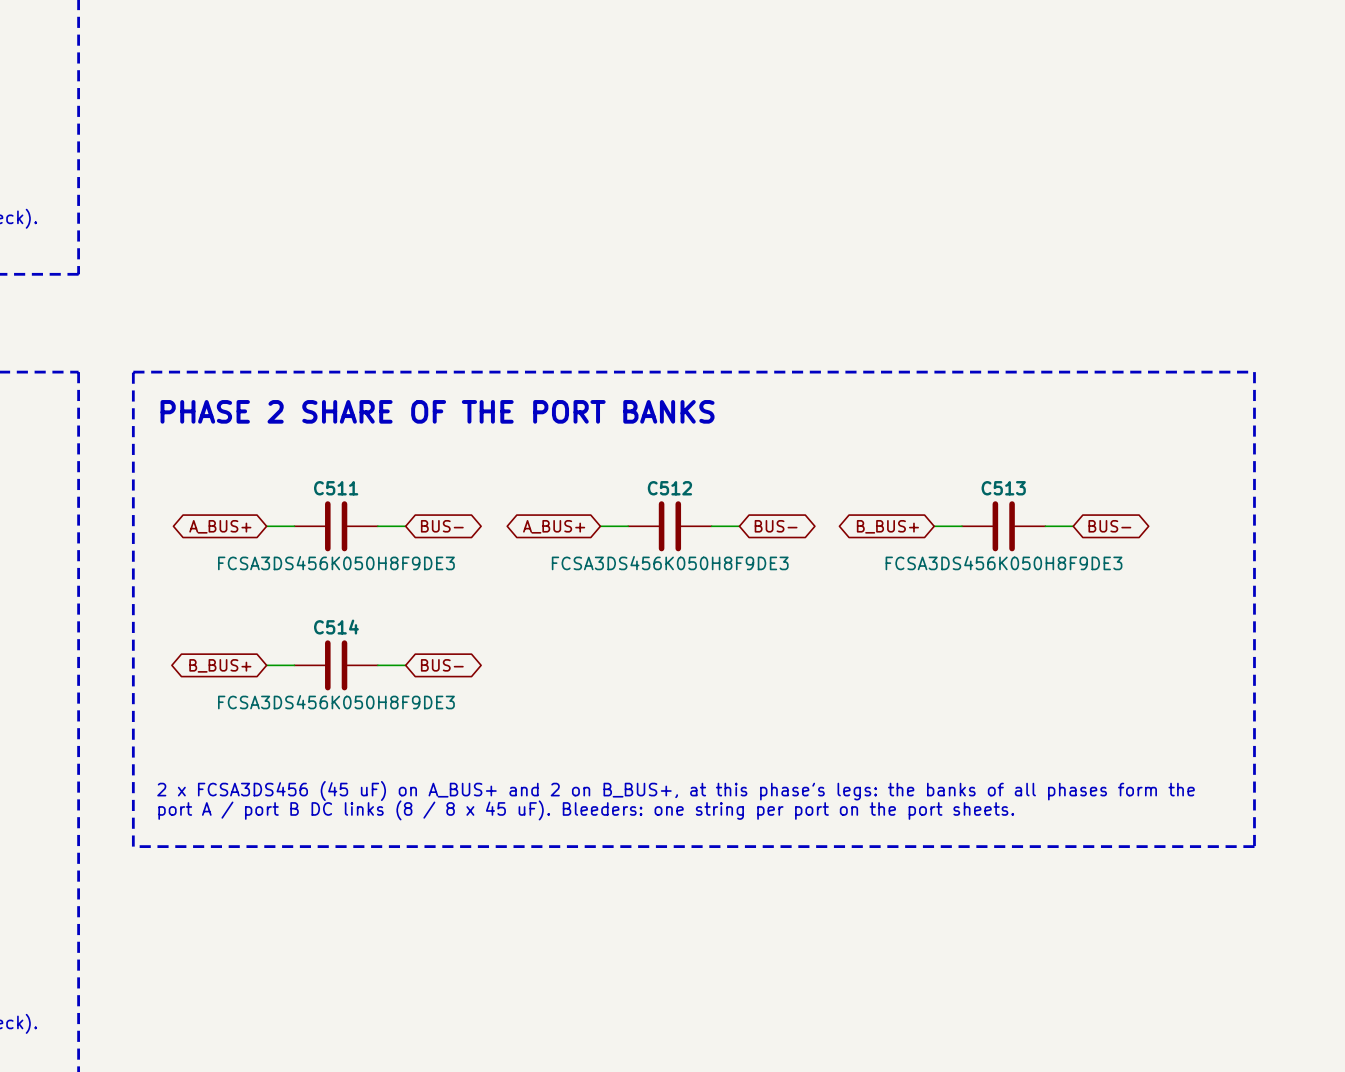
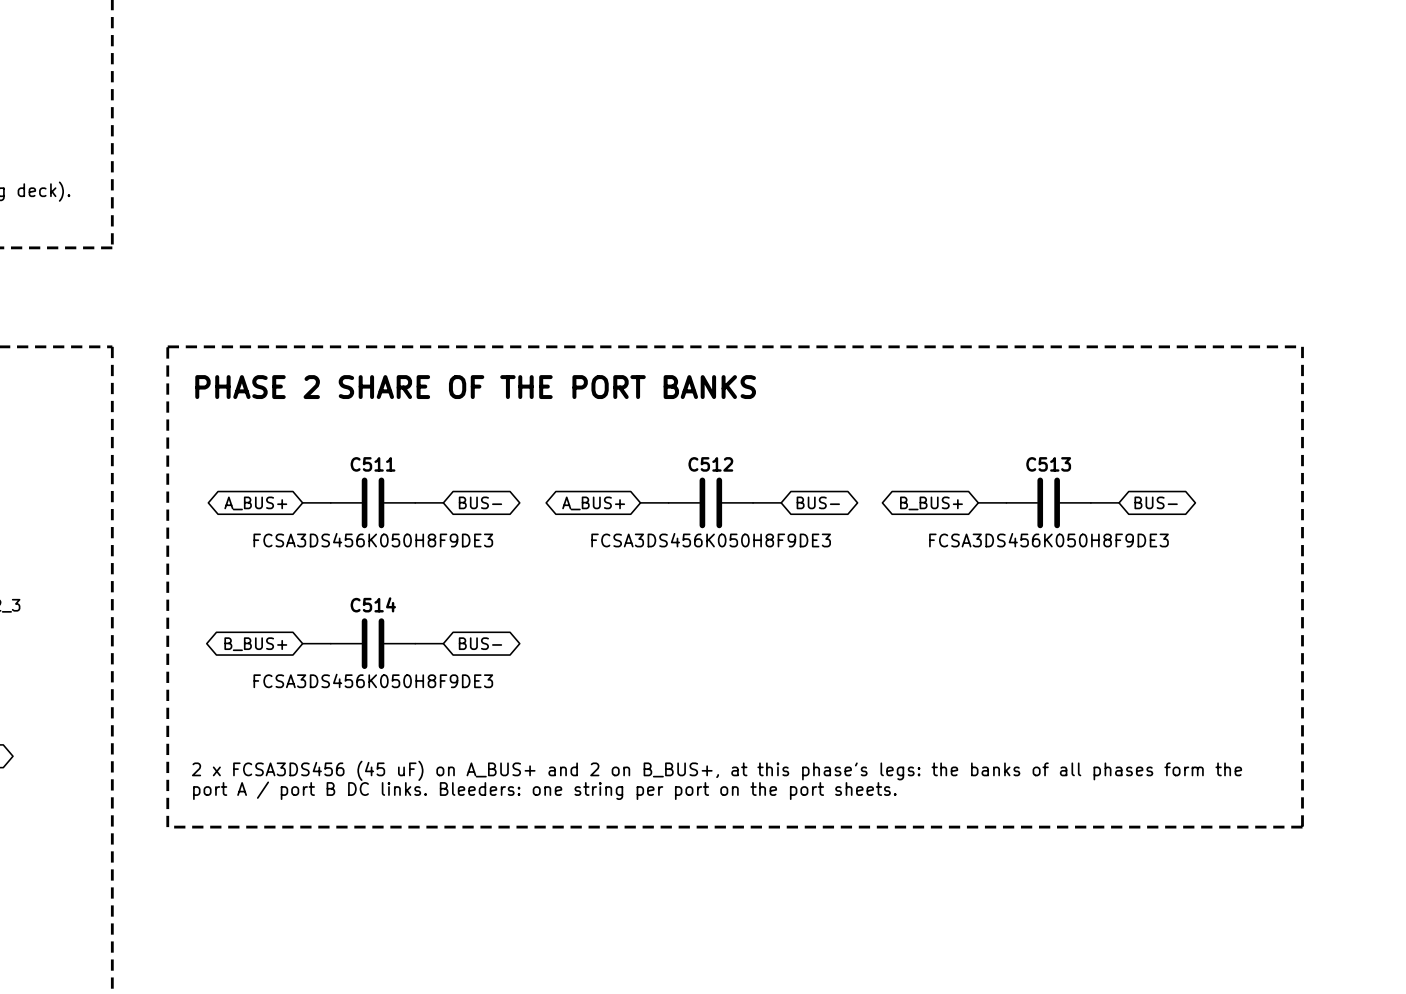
text: port A / port B DC links (8 / 8 x 45 uF). Bleeders: one string per port on the port sheets. (586, 810) -> port A / port B DC links. Bleeders: one string per port on the port sheets. (544, 790)

